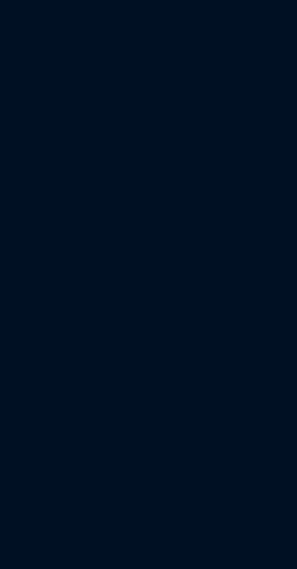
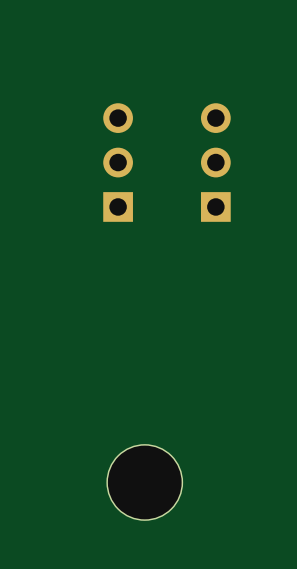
part: none -> (118, 162)
part: none -> (215, 162)
part: none -> (144, 482)

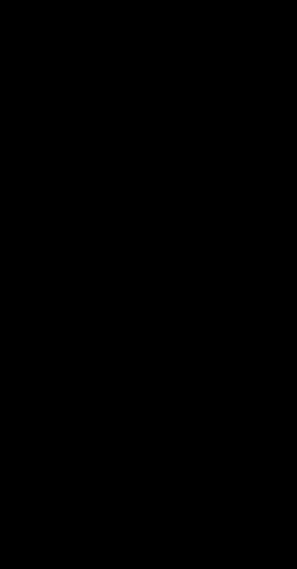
part: (118, 162) -> none
part: (215, 162) -> none
part: (144, 482) -> none

